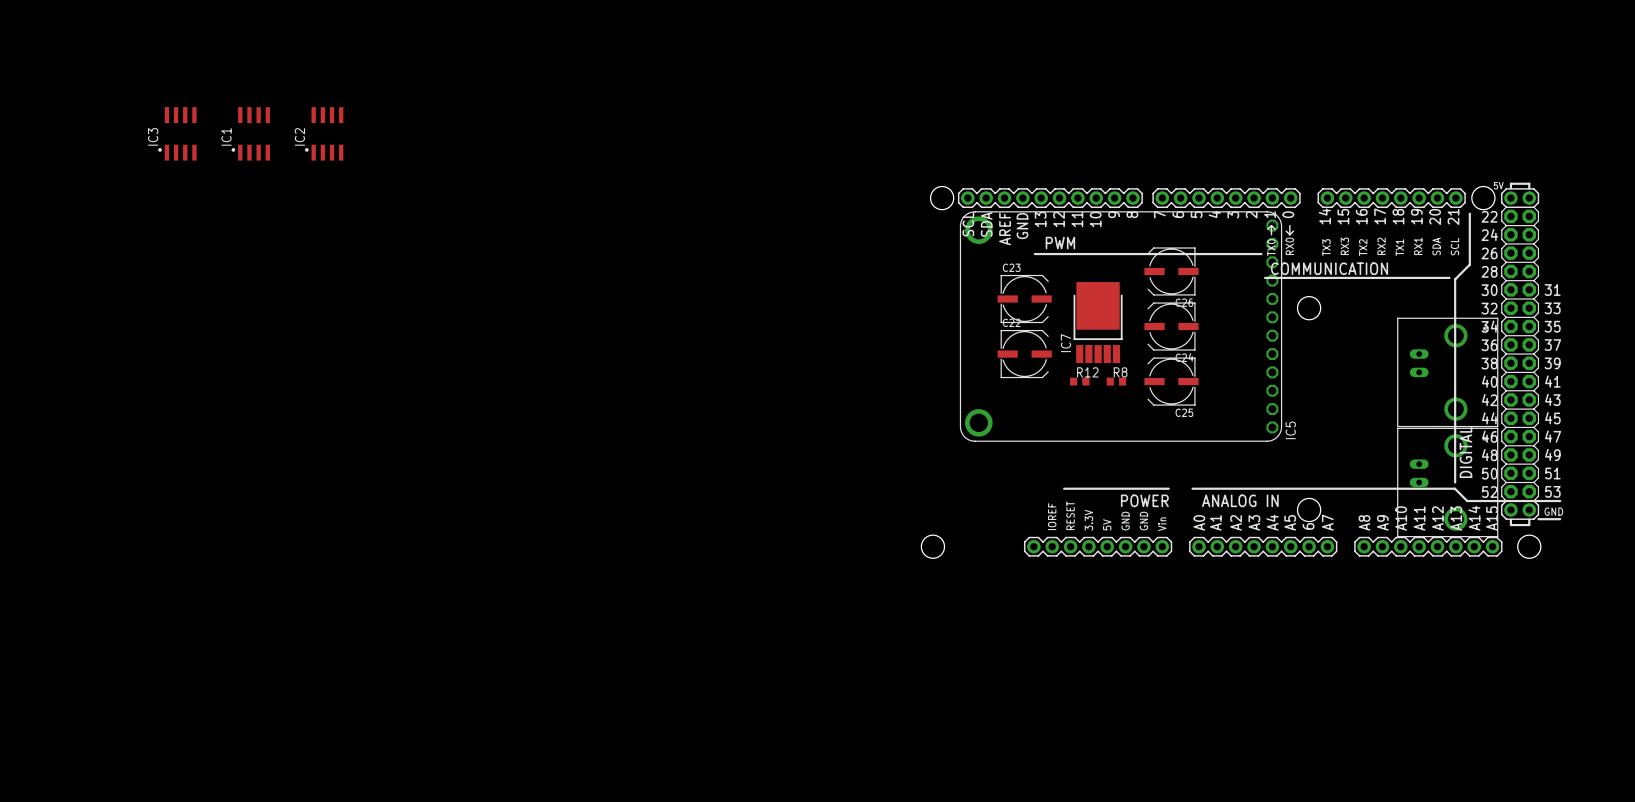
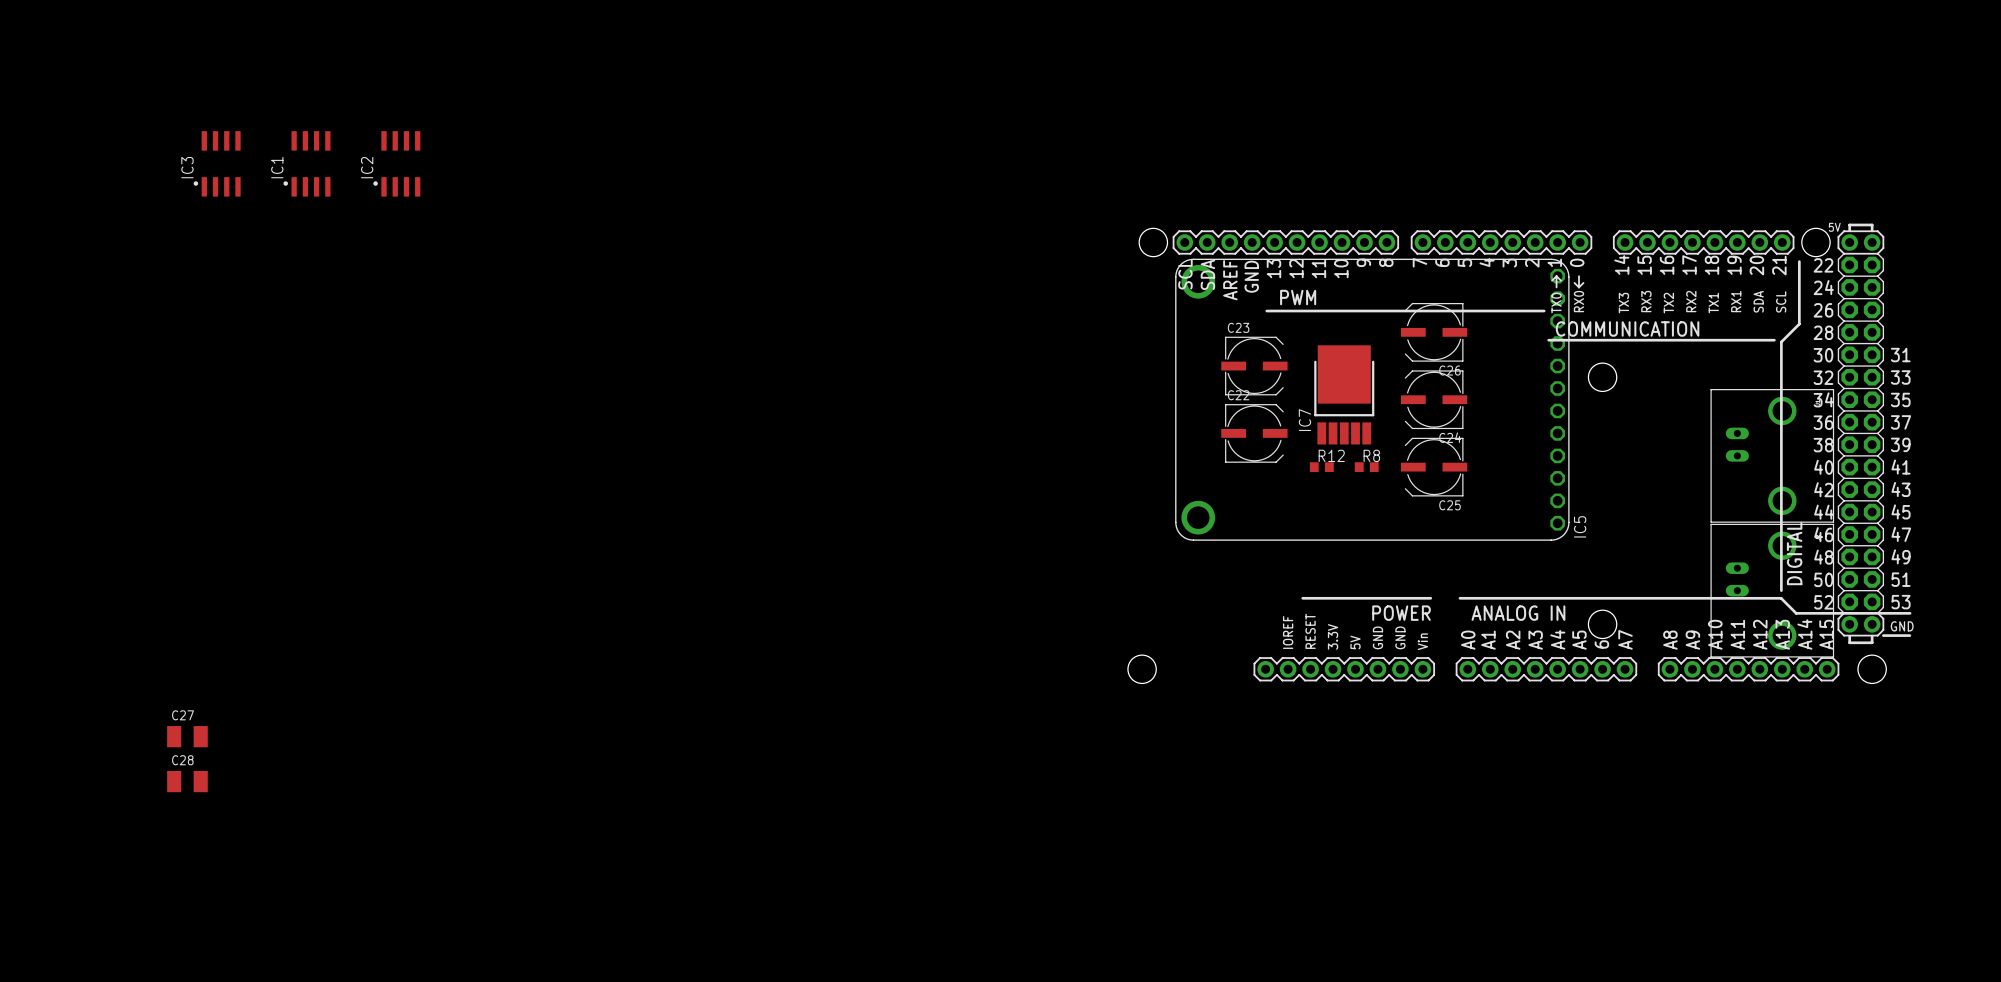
C27: none -> (187, 736)
C28: none -> (187, 781)

